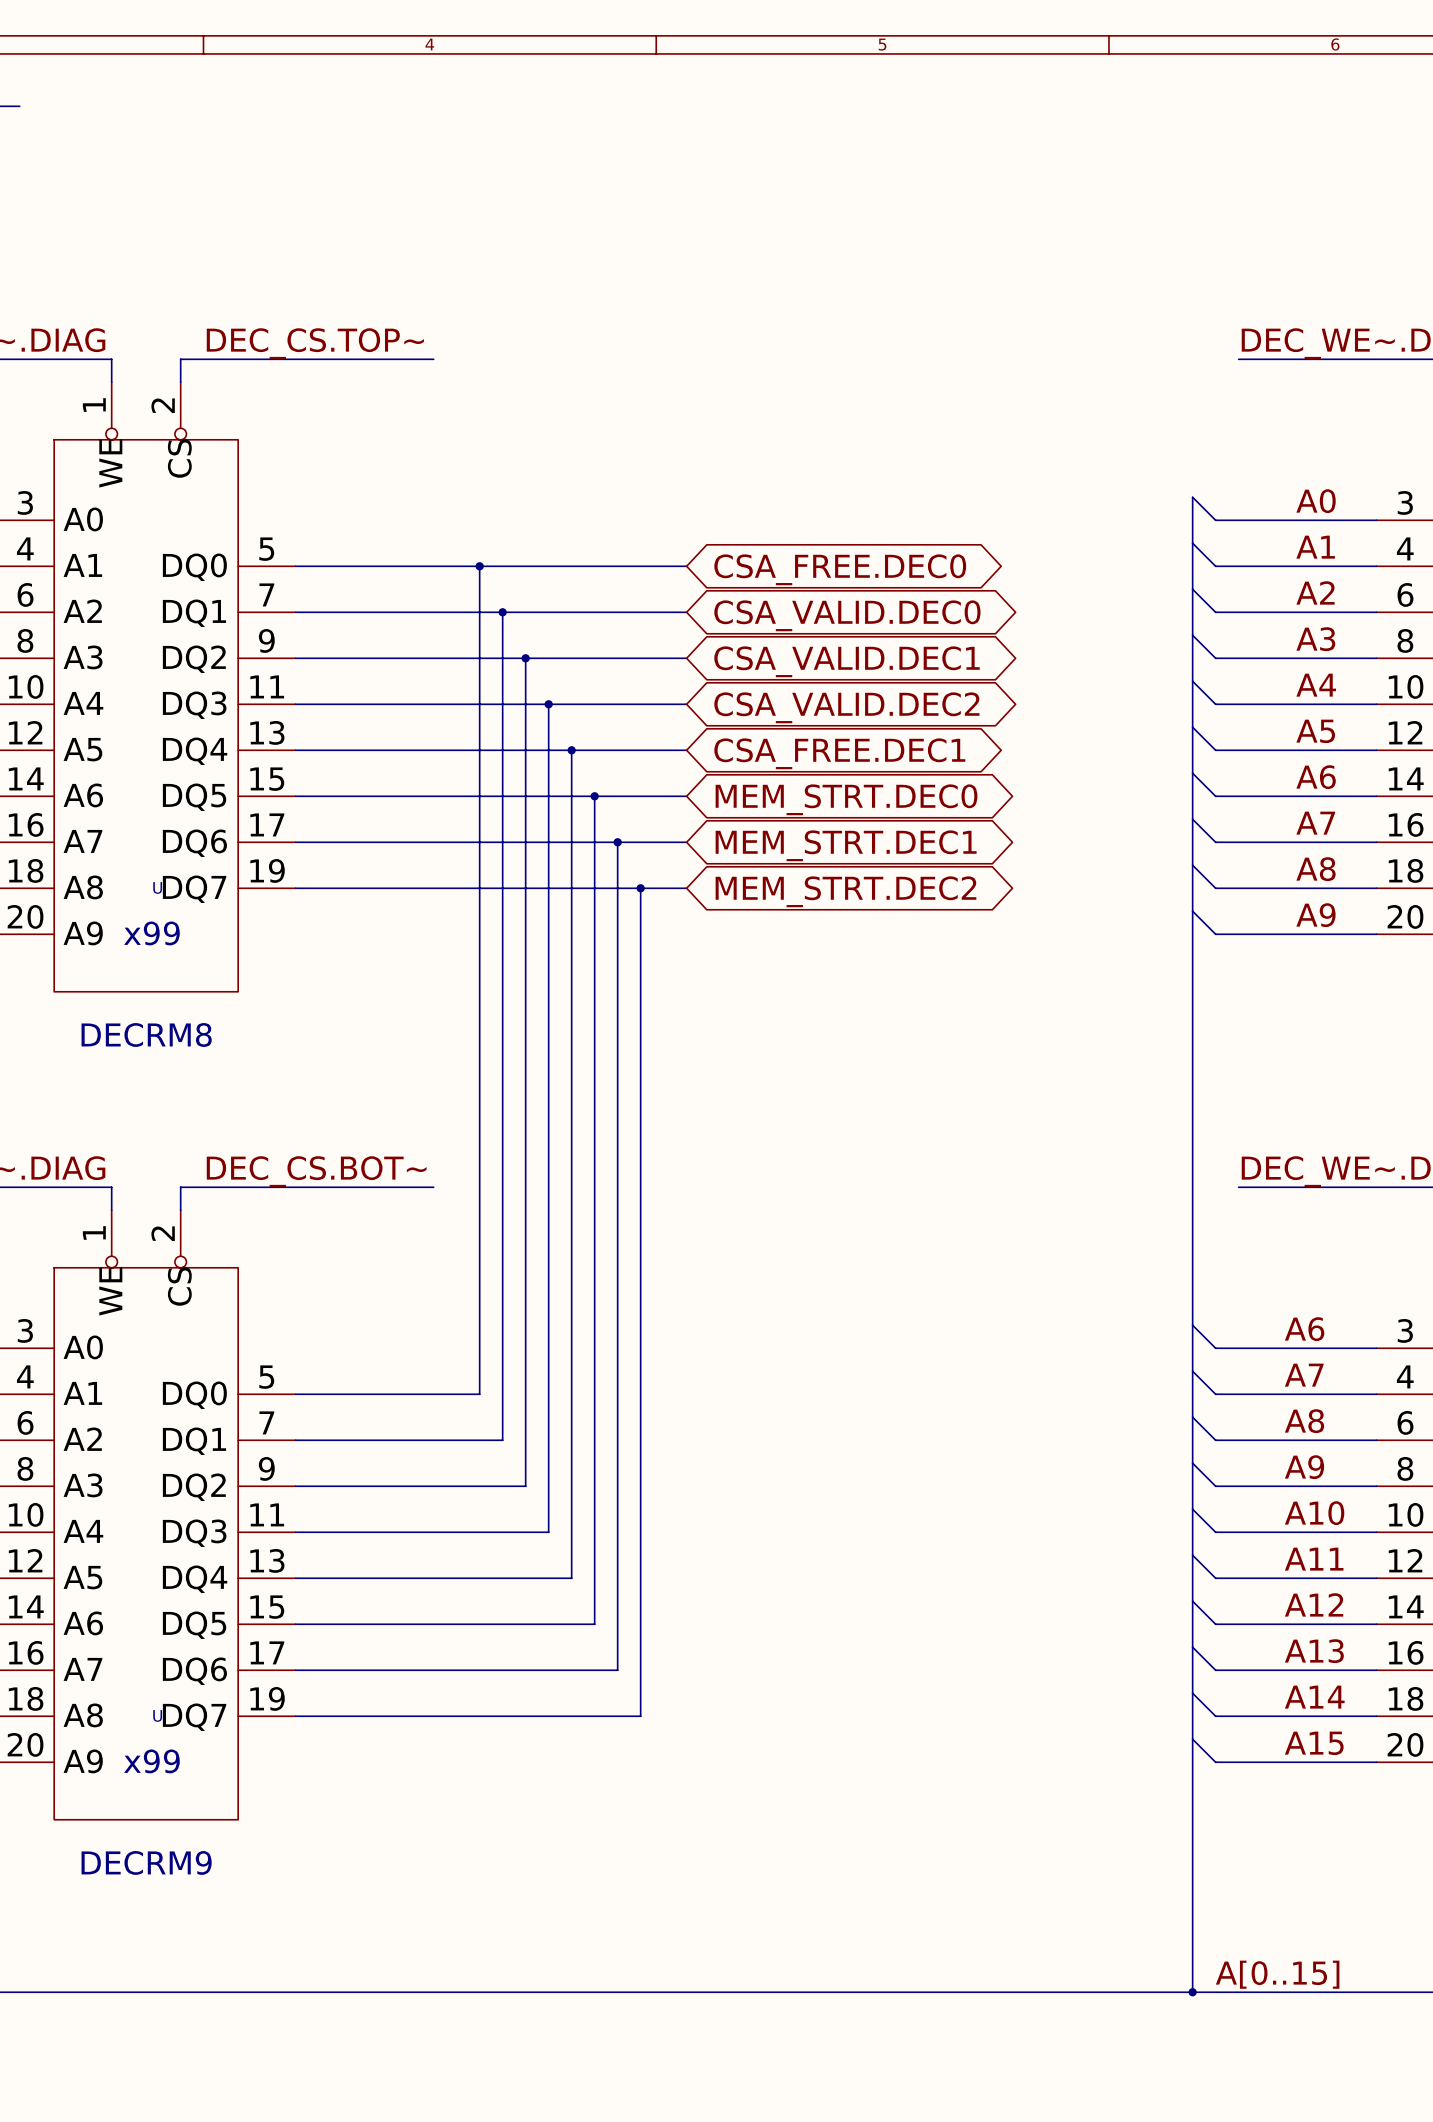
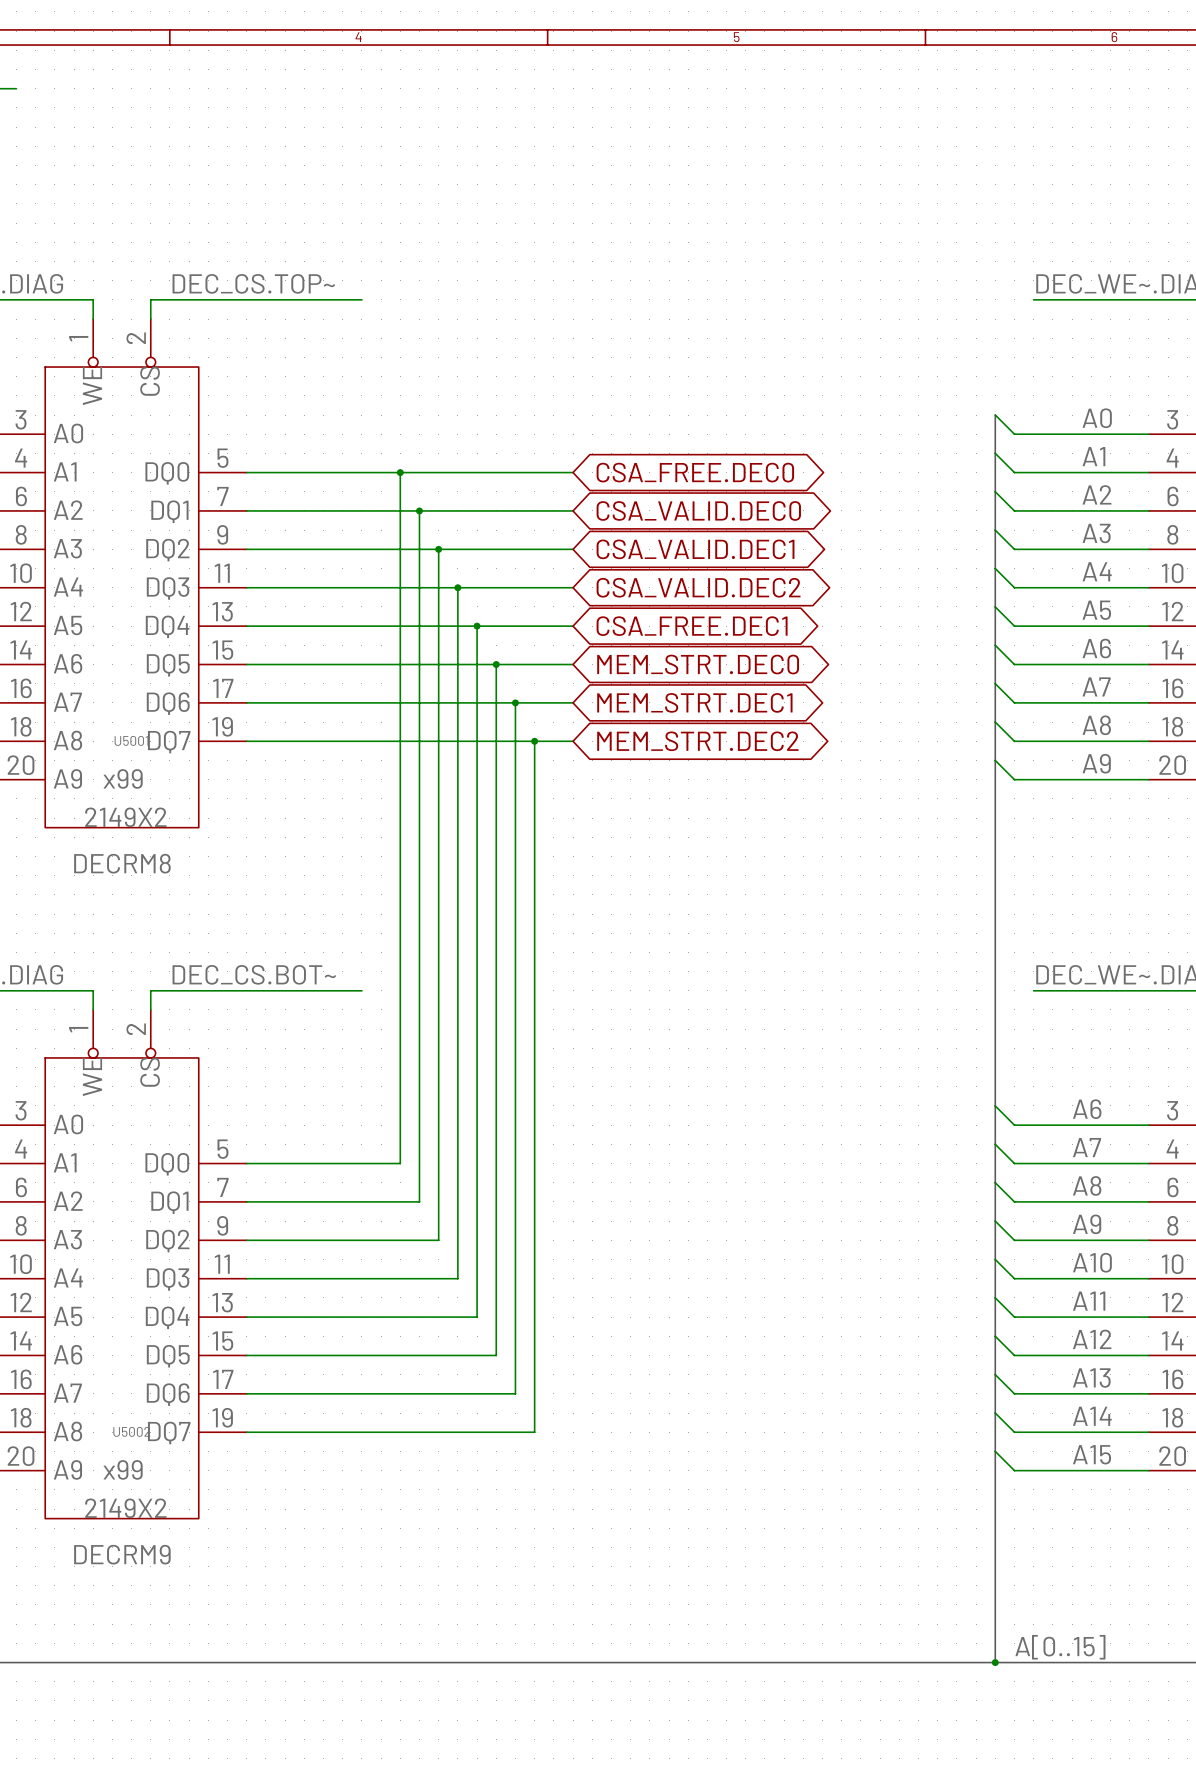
U name: U (157, 887) -> U5001 (131, 740)
U value: none -> 2149X2 (125, 817)
U name: U (157, 1715) -> U5002 (131, 1431)
U value: none -> 2149X2 (125, 1508)

